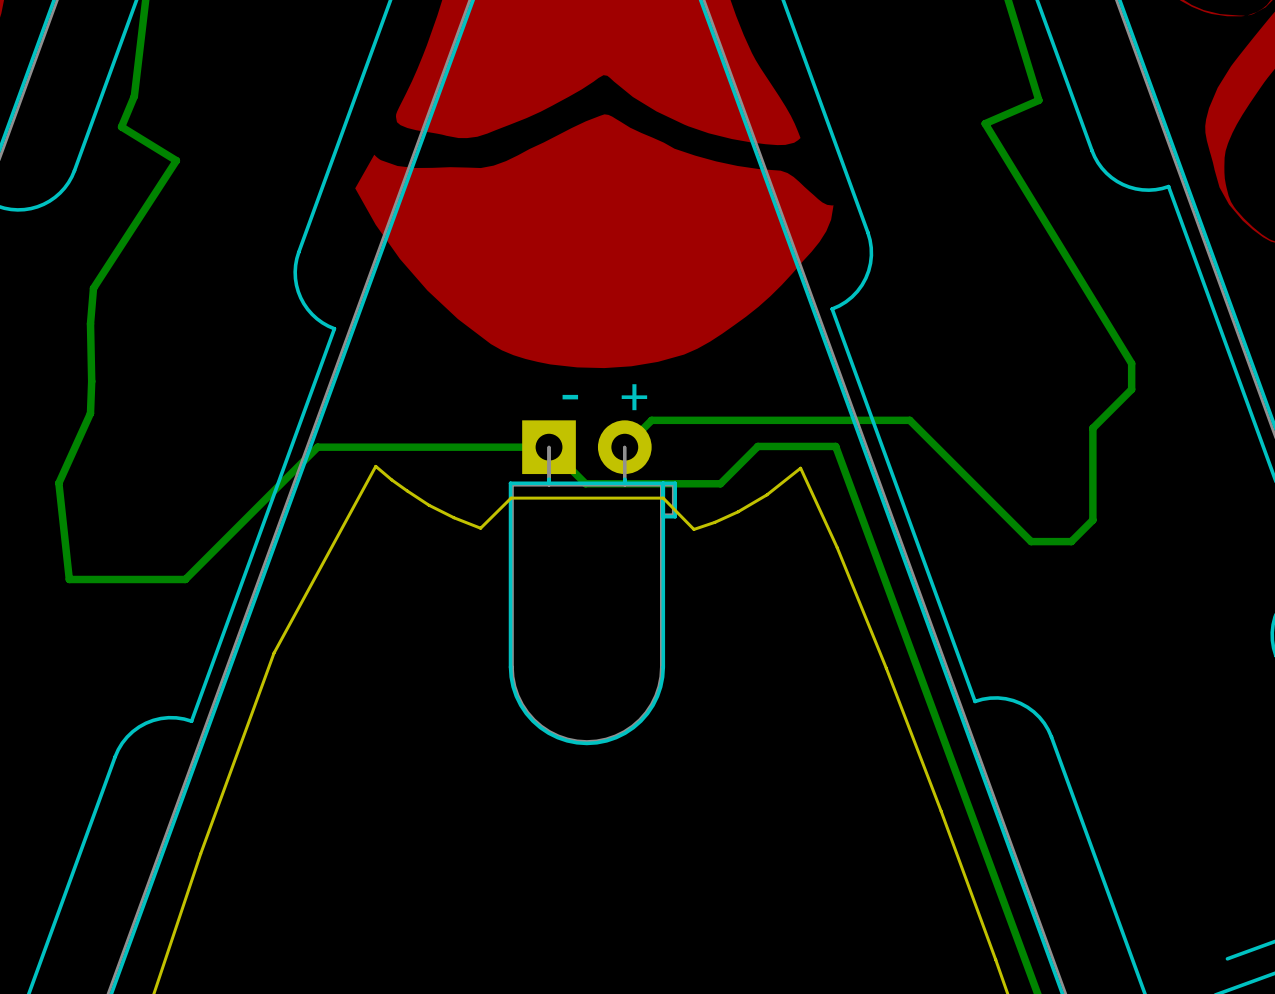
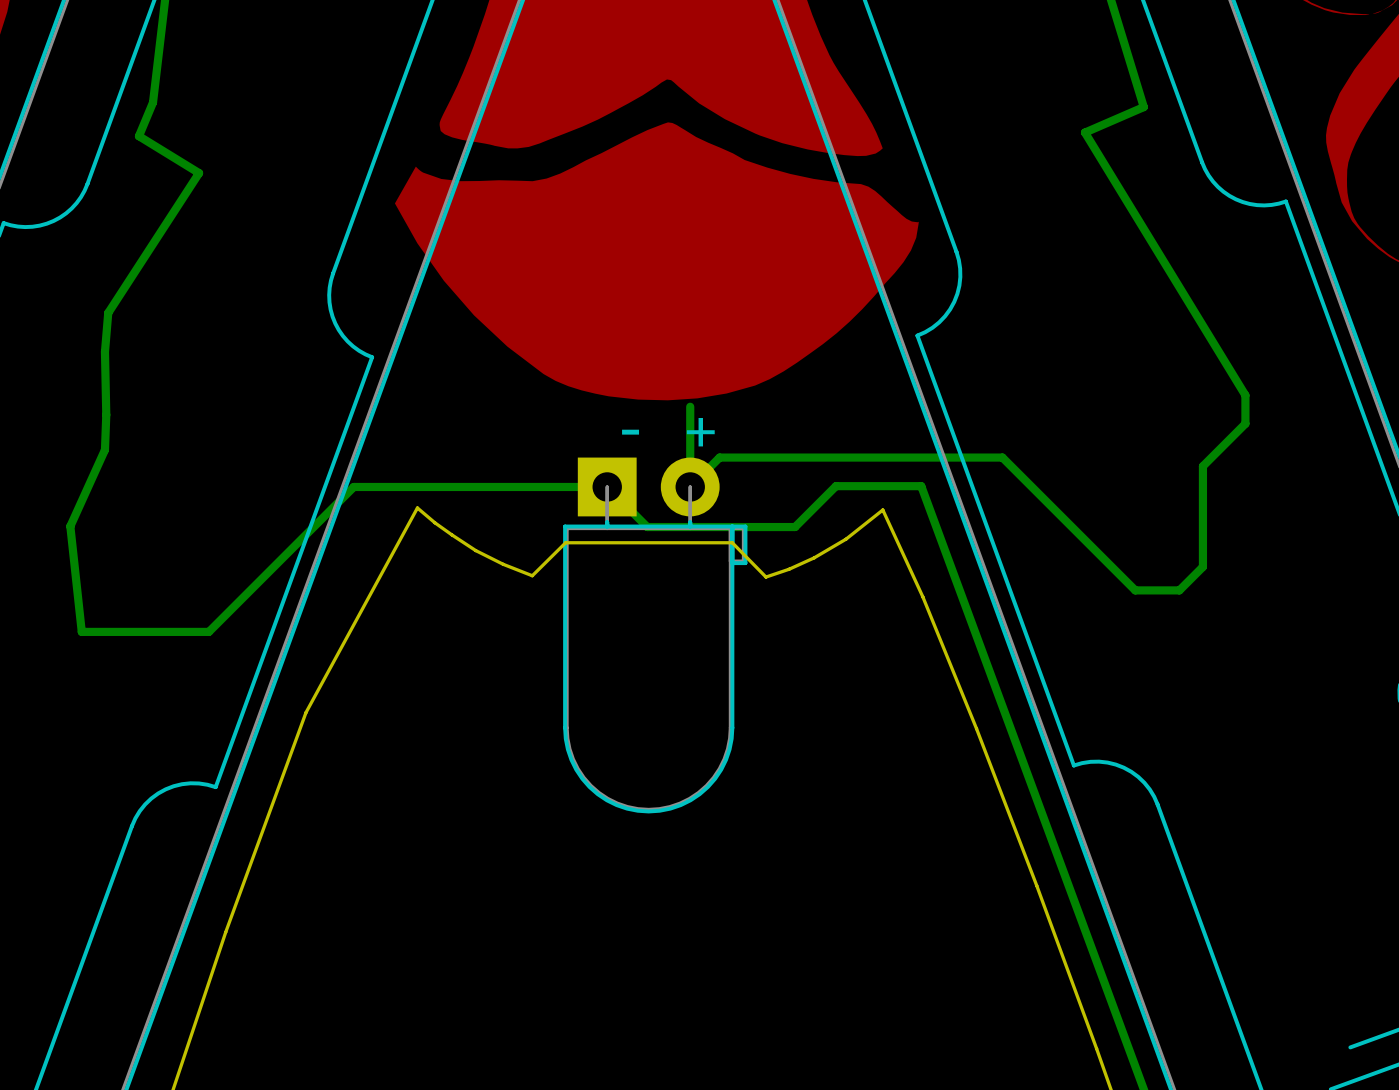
bottom track: none -> (690, 406) (690, 486)

